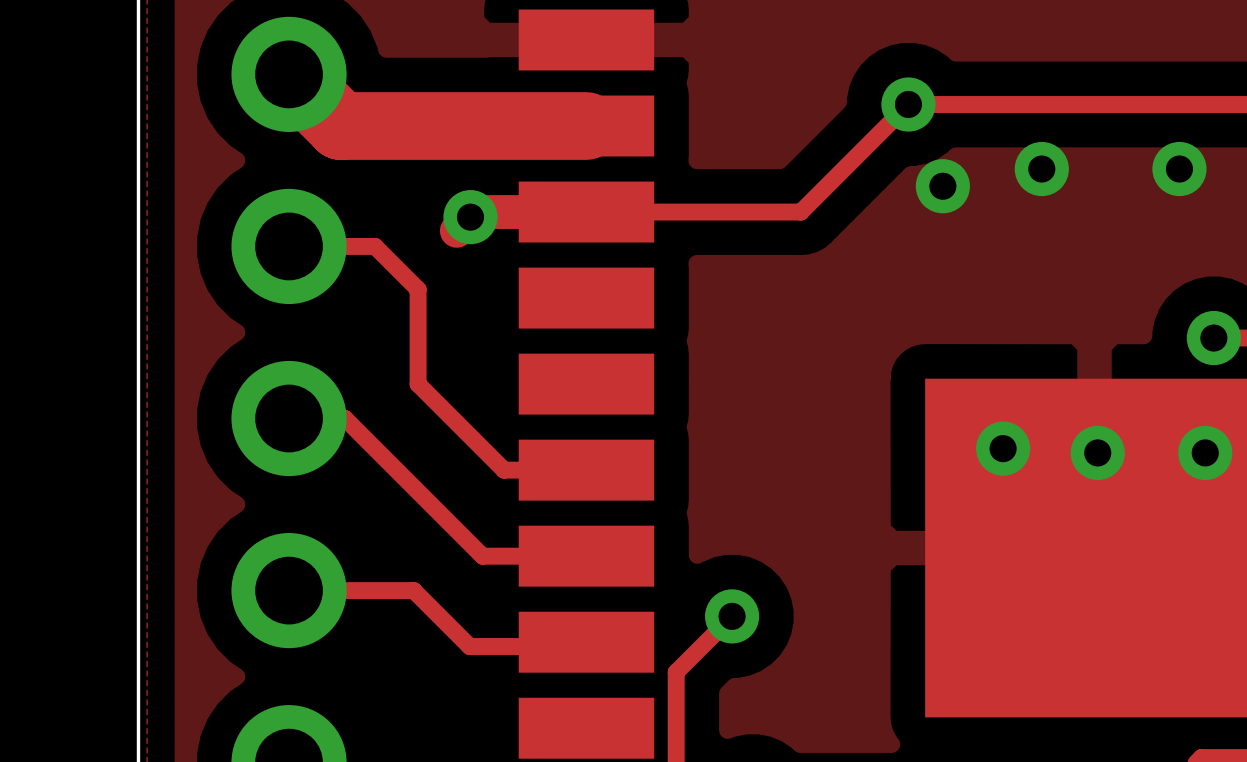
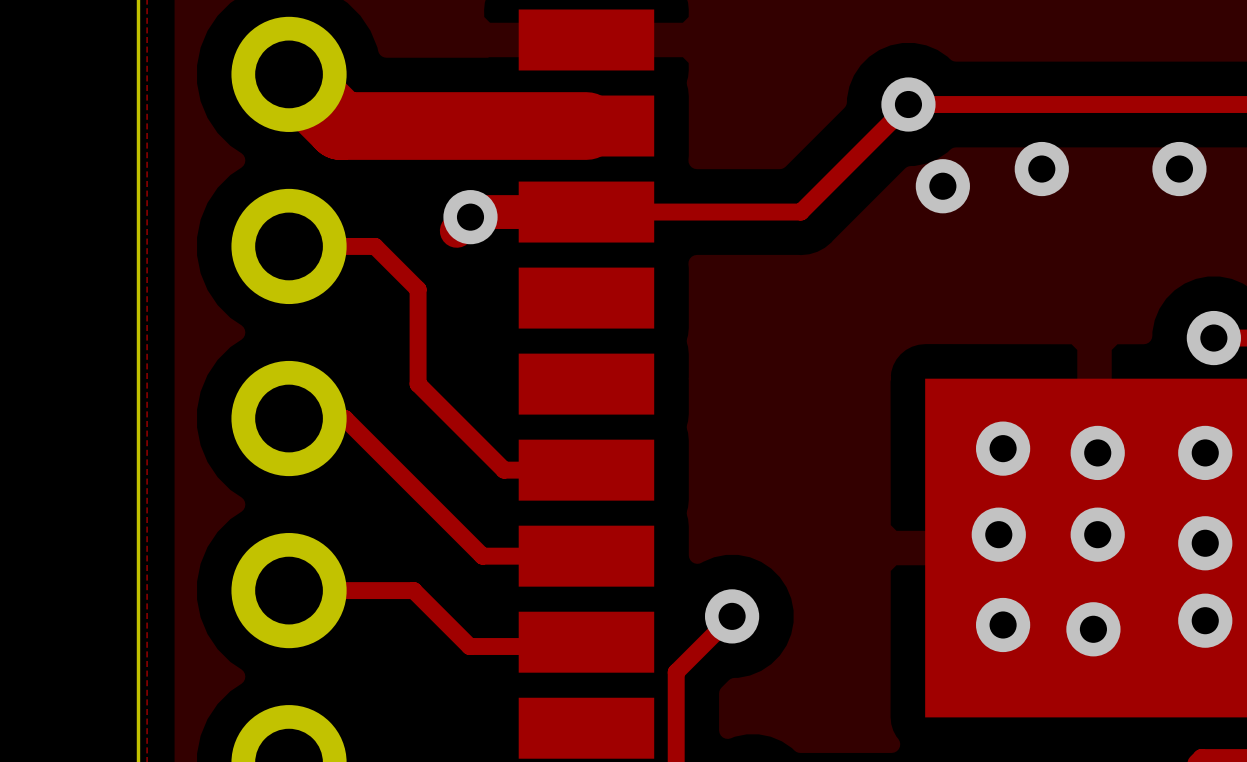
via: none -> (998, 534)
via: none -> (1097, 534)
via: none -> (1205, 543)
via: none -> (1205, 620)
via: none -> (1003, 624)
via: none -> (1093, 629)

